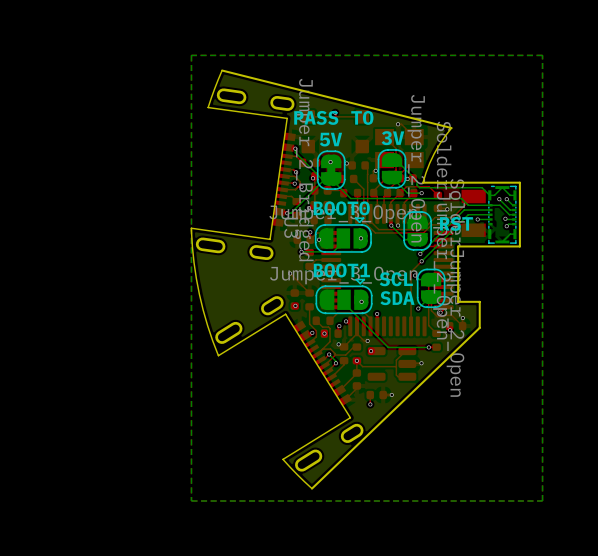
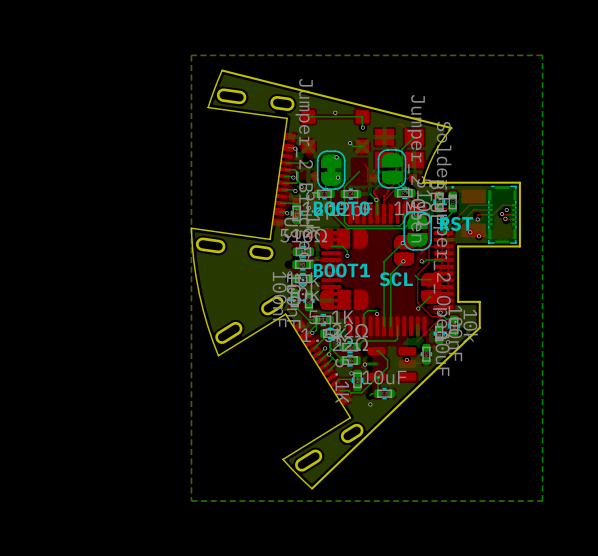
bottom track: none -> (308, 116) (362, 116) (362, 127)
top track: (362, 116) (308, 116) -> none
text: PASS TO (333, 117) -> none
via: (398, 124) -> none
via: none -> (362, 127)
text: 3V (392, 138) -> none
text: 5V (330, 139) -> none
bottom track: none -> (350, 143) (353, 146) (362, 146)
via: none -> (350, 143)
bottom track: (295, 148) (295, 152) (321, 178) (331, 178) (350, 198) (461, 198) (468, 205) (500, 205) (509, 214) (514, 214) -> (295, 148) (288, 147)
top track: (287, 156) (296, 156) (302, 162) -> none
via: none -> (336, 157)
bottom track: (391, 160) (396, 160) (416, 180) (416, 185) (419, 187) (482, 187) (489, 195) (494, 195) (502, 187) (510, 195) (514, 195) -> none
bottom track: none -> (308, 162) (286, 163)
part side: top (309, 162) -> bottom (296, 213)
via: (330, 162) -> none
via: (346, 163) -> none
part side: top (358, 165) -> bottom (350, 194)
bottom track: none -> (285, 169) (295, 169) (298, 172) (298, 180)
via: (375, 170) -> none
bottom track: none -> (325, 171) (325, 188) (330, 193) (330, 212) (346, 228) (403, 228) (411, 221) (411, 213)
bottom track: none -> (359, 171) (344, 186) (344, 222) (348, 225) (399, 225) (404, 221) (404, 213)
via: (296, 172) -> none
top track: (284, 176) (294, 176) (300, 181) (300, 185) (295, 189) (282, 189) -> none
bottom track: none -> (284, 176) (293, 177)
via: none -> (293, 177)
via: none -> (337, 177)
via: (312, 178) -> none
bottom track: (325, 178) (290, 213) (287, 213) -> none
part side: top (347, 178) -> bottom (324, 193)
top track: (353, 178) (363, 189) (363, 221) (375, 232) (423, 232) (431, 224) (468, 224) (473, 230) -> none
via: (407, 178) -> none
bottom track: none -> (298, 180) (302, 183)
bottom track: none -> (298, 180) (295, 183) (283, 183)
top track: (367, 182) (367, 203) (370, 206) (370, 221) (378, 229) (423, 229) (435, 217) (452, 217) (473, 196) -> none
via: (294, 183) -> none
bottom track: none -> (282, 189) (295, 191)
part side: top (321, 190) -> bottom (452, 199)
top track: (327, 190) (341, 190) (343, 193) -> none
via: none -> (295, 191)
part side: top (350, 193) -> bottom (439, 201)
bottom track: none -> (369, 193) (377, 200) (377, 213)
part side: top (380, 193) -> bottom (404, 193)
part side: top (406, 193) -> bottom (454, 326)
bottom track: (421, 193) (411, 193) -> (414, 137) (402, 149) (402, 183) (411, 193)
via: (421, 193) -> none
top track: (437, 195) (429, 186) (406, 186) (390, 202) (391, 225) -> none
via: none -> (376, 199)
bottom track: (499, 199) (510, 210) (514, 210) -> none
via: (499, 199) -> none
bottom track: (506, 199) (514, 205) -> none
via: (506, 199) -> none
bottom track: none -> (280, 203) (293, 203) (296, 206)
top track: none -> (490, 205) (469, 205) (441, 232) (441, 268) (431, 279)
top track: none -> (514, 205) (502, 205) (493, 214) (477, 216)
bottom track: none -> (452, 208) (452, 212) (443, 220) (443, 232)
via: (447, 209) -> none
top track: none -> (490, 210) (473, 210) (448, 235) (448, 291) (442, 297) (431, 297)
bottom track: (490, 210) (464, 210) (420, 253) -> none
via: none -> (506, 210)
bottom track: none -> (279, 211) (285, 213)
bottom track: (490, 214) (468, 214) (421, 261) -> none
top track: none -> (502, 214) (514, 214)
via: none -> (502, 214)
bottom track: (505, 218) (514, 219) -> none
bottom track: (490, 219) (477, 219) -> none
top track: none -> (514, 219) (506, 220)
part side: top (321, 220) -> bottom (303, 251)
bottom track: (514, 224) (506, 226) -> none
bottom track: (391, 225) (405, 239) (417, 239) -> none
via: (391, 225) -> none
via: (398, 225) -> none
via: (506, 226) -> none
via: (310, 232) -> none
via: none -> (470, 232)
bottom track: (514, 234) (510, 234) (502, 241) -> none
part side: bottom (343, 235) -> top (343, 238)
via: none -> (479, 236)
bottom track: (343, 238) (343, 241) (333, 251) (301, 251) -> none
via: (360, 238) -> none
part side: top (303, 239) -> bottom (439, 333)
via: (319, 239) -> none
bottom track: none -> (402, 243) (384, 261) (384, 326)
via: none -> (402, 243)
bottom track: none -> (331, 246) (342, 246) (347, 251) (347, 255)
part: none -> (404, 250)
via: (301, 251) -> none
via: (420, 253) -> none
via: none -> (347, 255)
part side: top (309, 259) -> bottom (302, 264)
bottom track: none -> (443, 259) (426, 259) (423, 263)
bottom track: none -> (403, 261) (390, 273) (390, 326)
via: none -> (403, 261)
top track: (421, 261) (411, 271) (411, 326) -> none
top track: (290, 273) (309, 293) -> none
via: (415, 275) -> none
top track: (443, 280) (433, 280) (428, 284) (428, 325) (436, 333) -> none
part side: bottom (431, 288) -> top (431, 288)
part side: bottom (344, 296) -> top (344, 299)
text: SDA (397, 298) -> none
part side: top (294, 299) -> bottom (294, 299)
part side: top (309, 299) -> bottom (357, 380)
bottom track: (344, 299) (344, 303) (388, 347) (428, 347) -> none
top track: (443, 300) (435, 300) (431, 304) (431, 310) (437, 316) -> (384, 200) (393, 191) (406, 191) (429, 213) (429, 263) (417, 274) (417, 302) (431, 316) (437, 316)
via: (361, 301) -> none
via: (295, 305) -> none
bottom track: none -> (294, 306) (308, 319) (316, 319) (315, 331)
top track: (309, 306) (309, 324) (316, 330) (316, 336) (310, 343) -> none
bottom track: none -> (376, 310) (367, 310) (363, 314) (363, 326)
top track: none -> (441, 316) (416, 341)
top track: (443, 316) (451, 315) (462, 326) (462, 318) -> none
bottom track: none -> (443, 316) (446, 319) (454, 319)
via: (462, 318) -> none
bottom track: none -> (330, 319) (330, 351) (320, 360)
top track: (316, 320) (322, 327) (330, 328) (330, 341) (317, 354) -> none
part side: top (323, 320) -> bottom (350, 360)
top track: (330, 320) (338, 312) (364, 312) (370, 318) (370, 326) -> none
via: (346, 321) -> none
bottom track: none -> (316, 324) (305, 335)
via: (339, 326) -> none
bottom track: none -> (397, 326) (397, 338) (395, 340) (362, 340) (356, 347)
part side: top (456, 326) -> bottom (308, 300)
via: (450, 330) -> none
bottom track: none -> (323, 333) (323, 338) (313, 348)
via: (324, 333) -> none
part side: top (331, 333) -> bottom (349, 347)
top track: (357, 333) (364, 340) (367, 340) -> none
top track: (357, 333) (344, 346) -> none
via: (367, 340) -> none
part side: top (436, 340) -> bottom (302, 278)
via: none -> (448, 342)
bottom track: none -> (330, 347) (343, 360) (339, 360) (328, 371)
top track: (356, 347) (353, 347) (345, 355) (335, 355) -> none
via: (428, 347) -> none
bottom track: none -> (325, 348) (317, 354)
via: none -> (325, 348)
top track: (322, 349) (330, 349) (335, 355) -> none
via: (371, 351) -> none
bottom track: none -> (376, 351) (387, 360) (387, 367) (376, 376)
top track: (407, 351) (396, 360) (396, 375) (407, 376) -> none
part side: top (344, 353) -> bottom (330, 333)
part side: top (356, 353) -> bottom (323, 319)
top track: (335, 355) (324, 365) -> none
bottom track: none -> (332, 358) (324, 366)
via: none -> (406, 359)
top track: (344, 360) (344, 364) (331, 377) -> none
via: (356, 360) -> none
via: (335, 363) -> none
bottom track: none -> (376, 363) (364, 364)
via: (421, 363) -> none
via: none -> (364, 364)
top track: (396, 366) (362, 366) (356, 360) (356, 373) (339, 390) -> none
via: none -> (351, 373)
bottom track: none -> (376, 376) (378, 393) (369, 395)
bottom track: none -> (376, 376) (361, 392) (339, 390)
part side: top (356, 379) -> bottom (384, 393)
bottom track: none -> (335, 383) (339, 379) (349, 379) (357, 387)
via: (391, 394) -> none
top track: (370, 395) (370, 404) -> none
part side: top (376, 395) -> bottom (426, 354)

